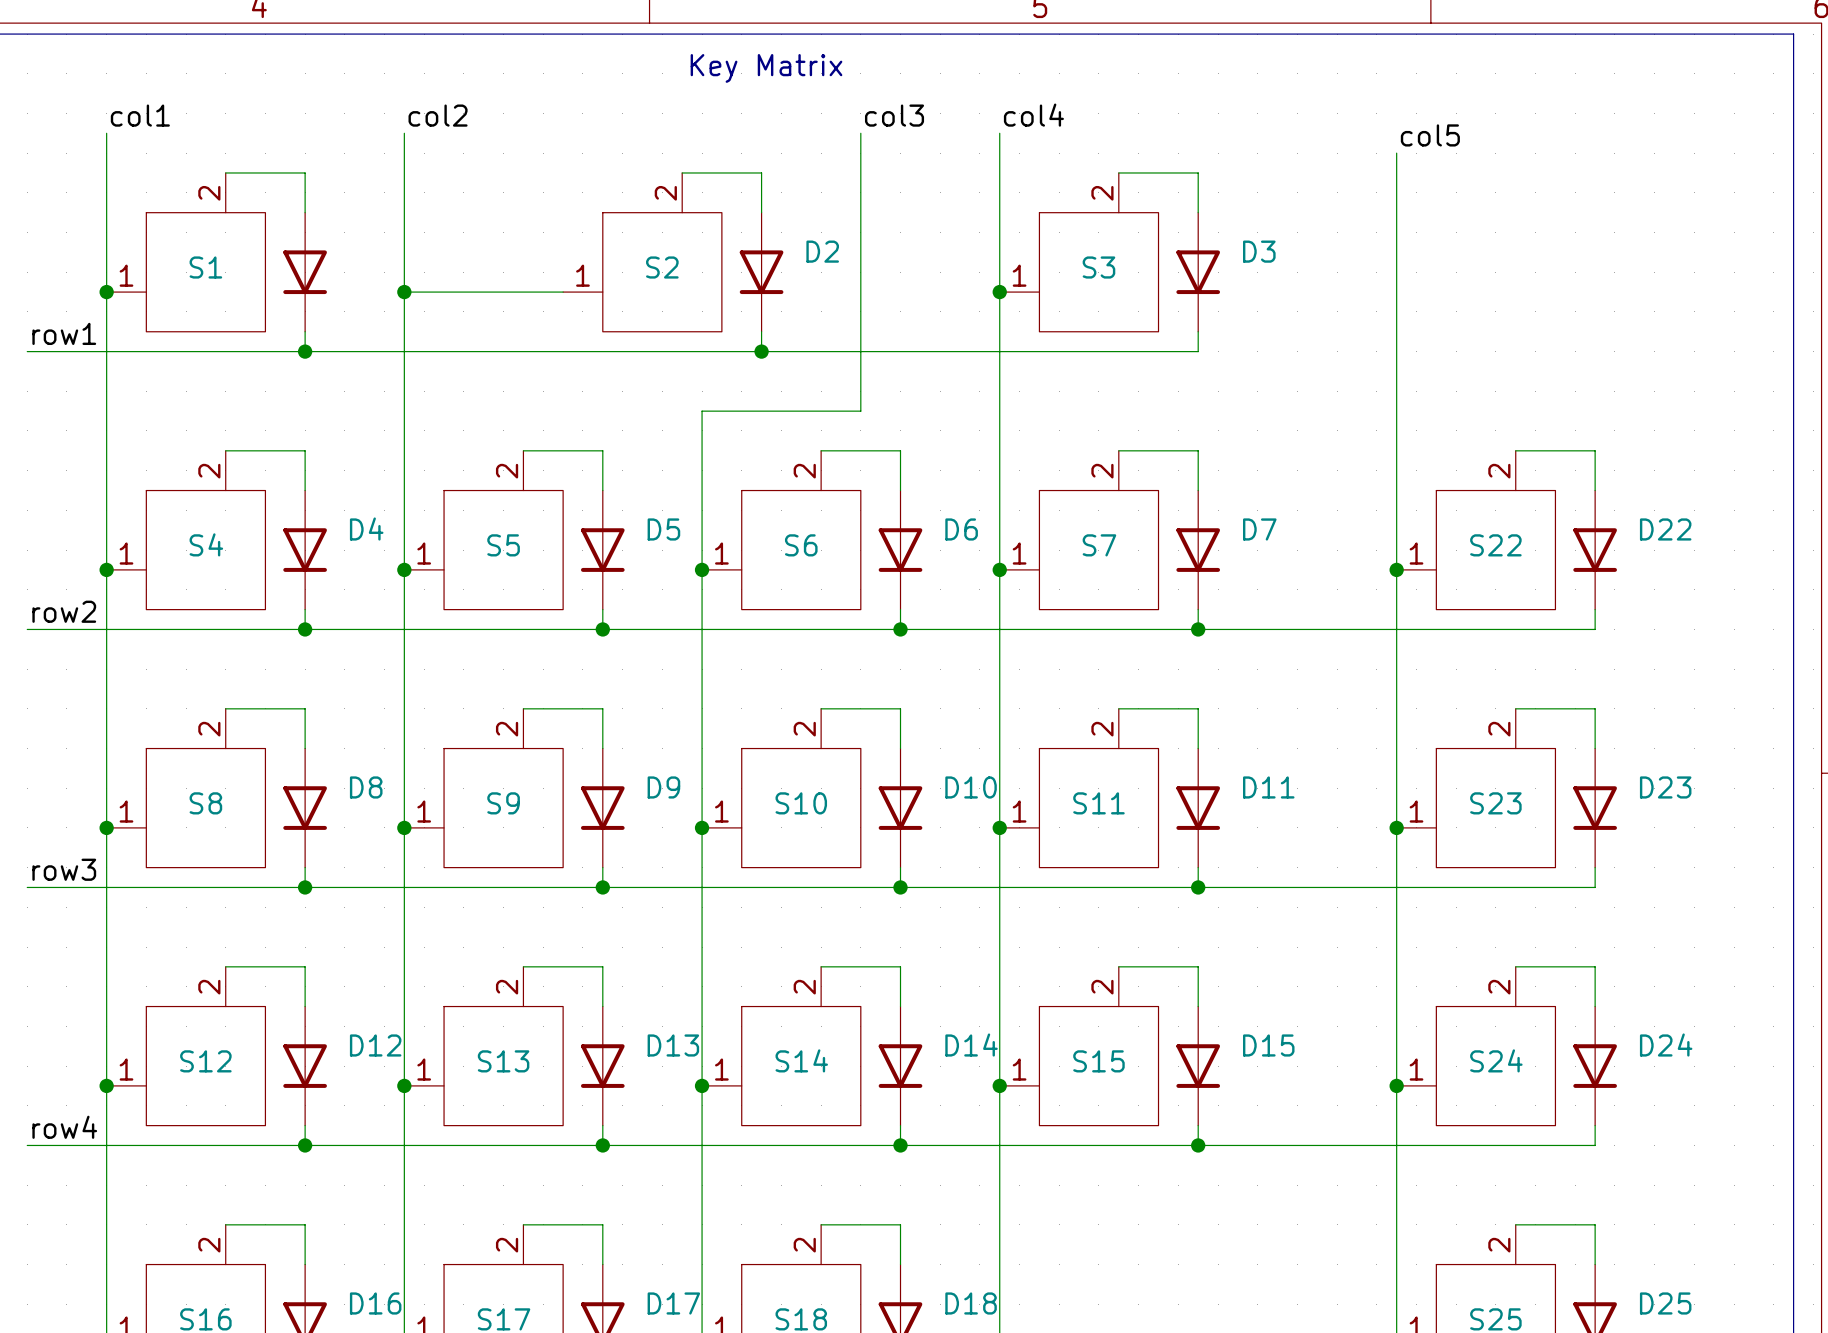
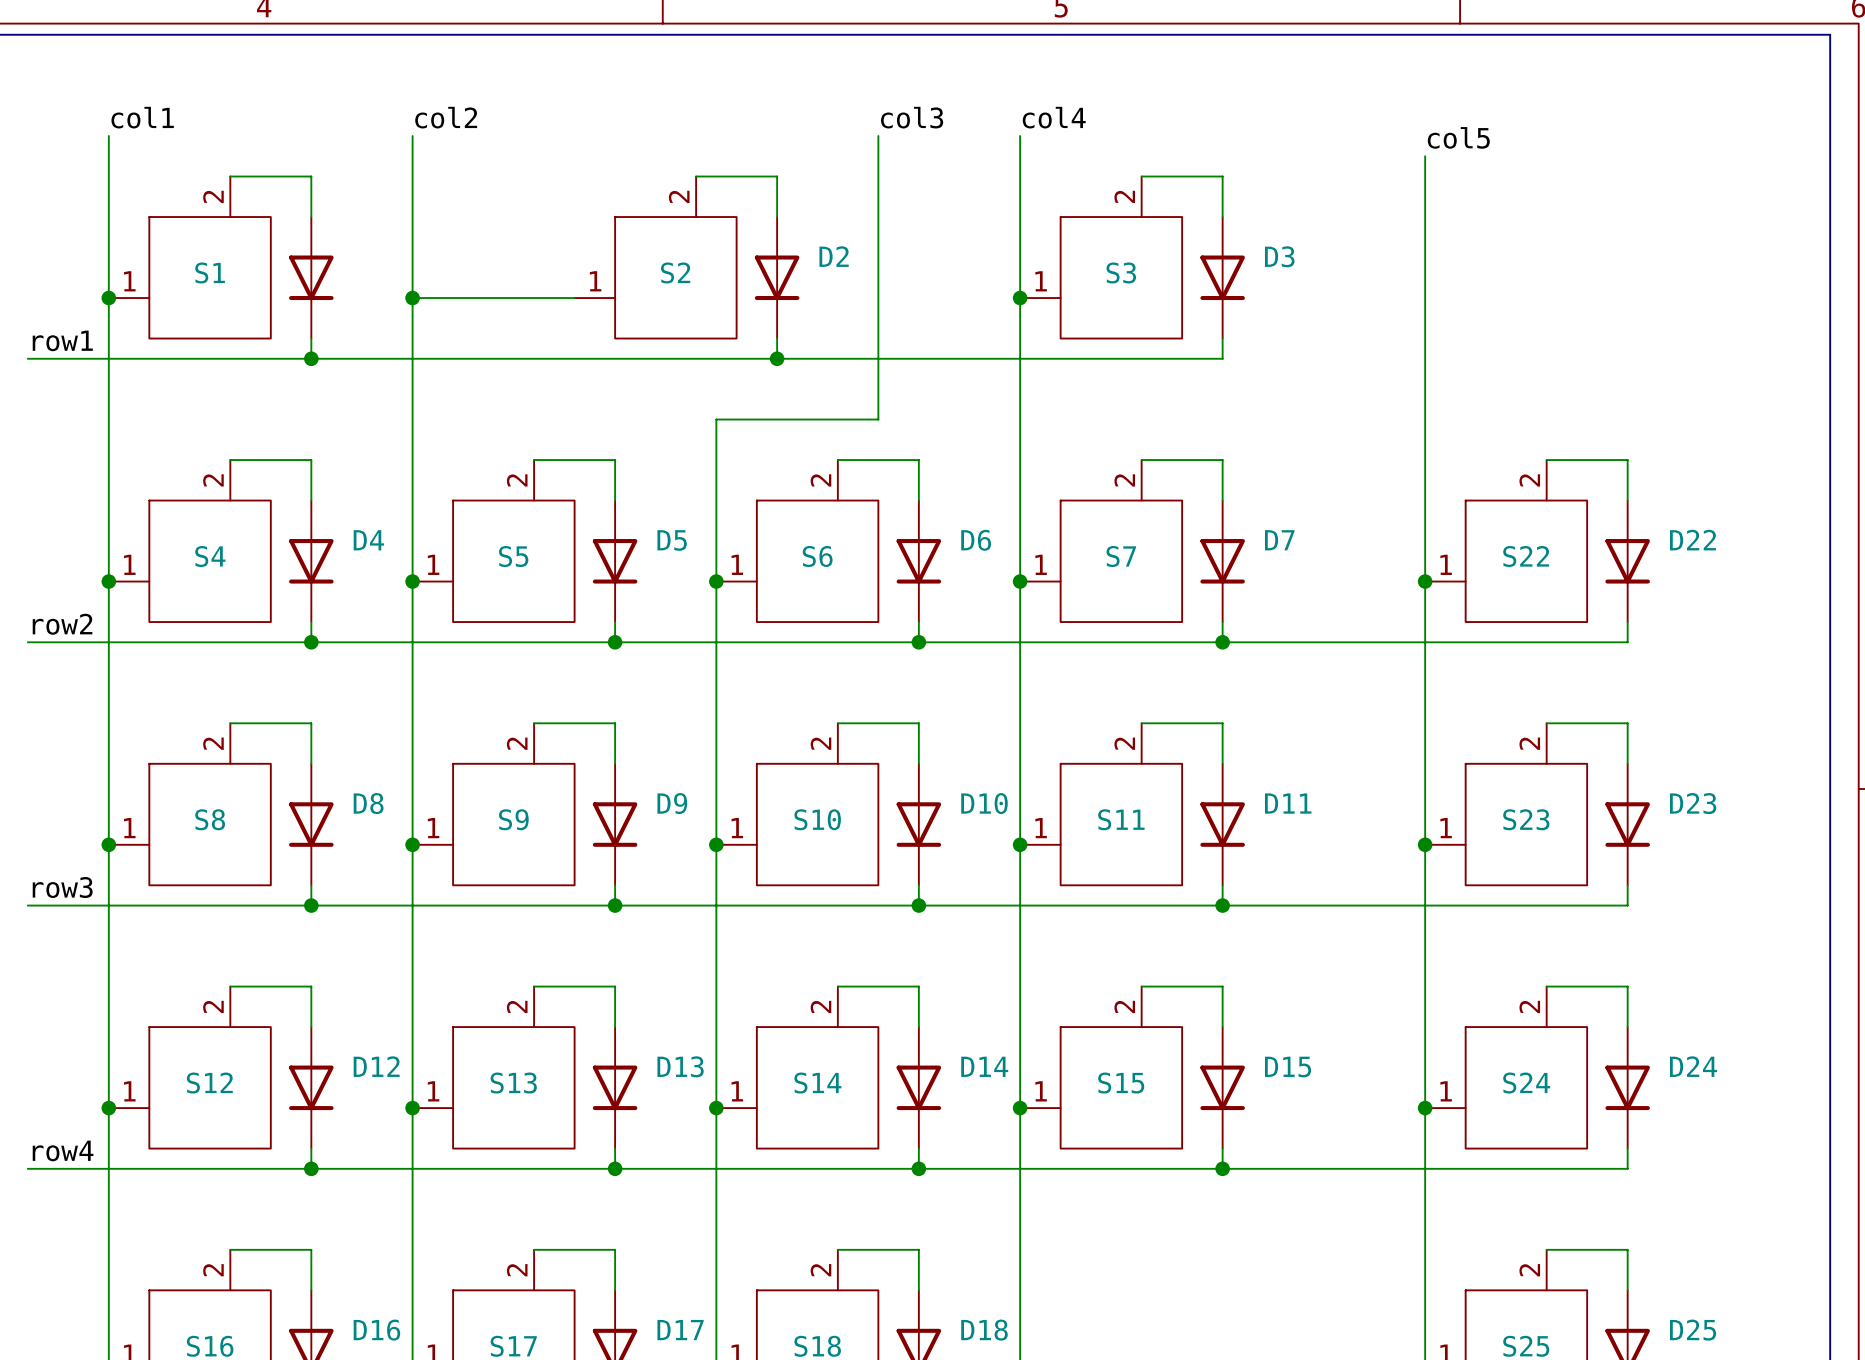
text: Key Matrix (766, 68) -> none

